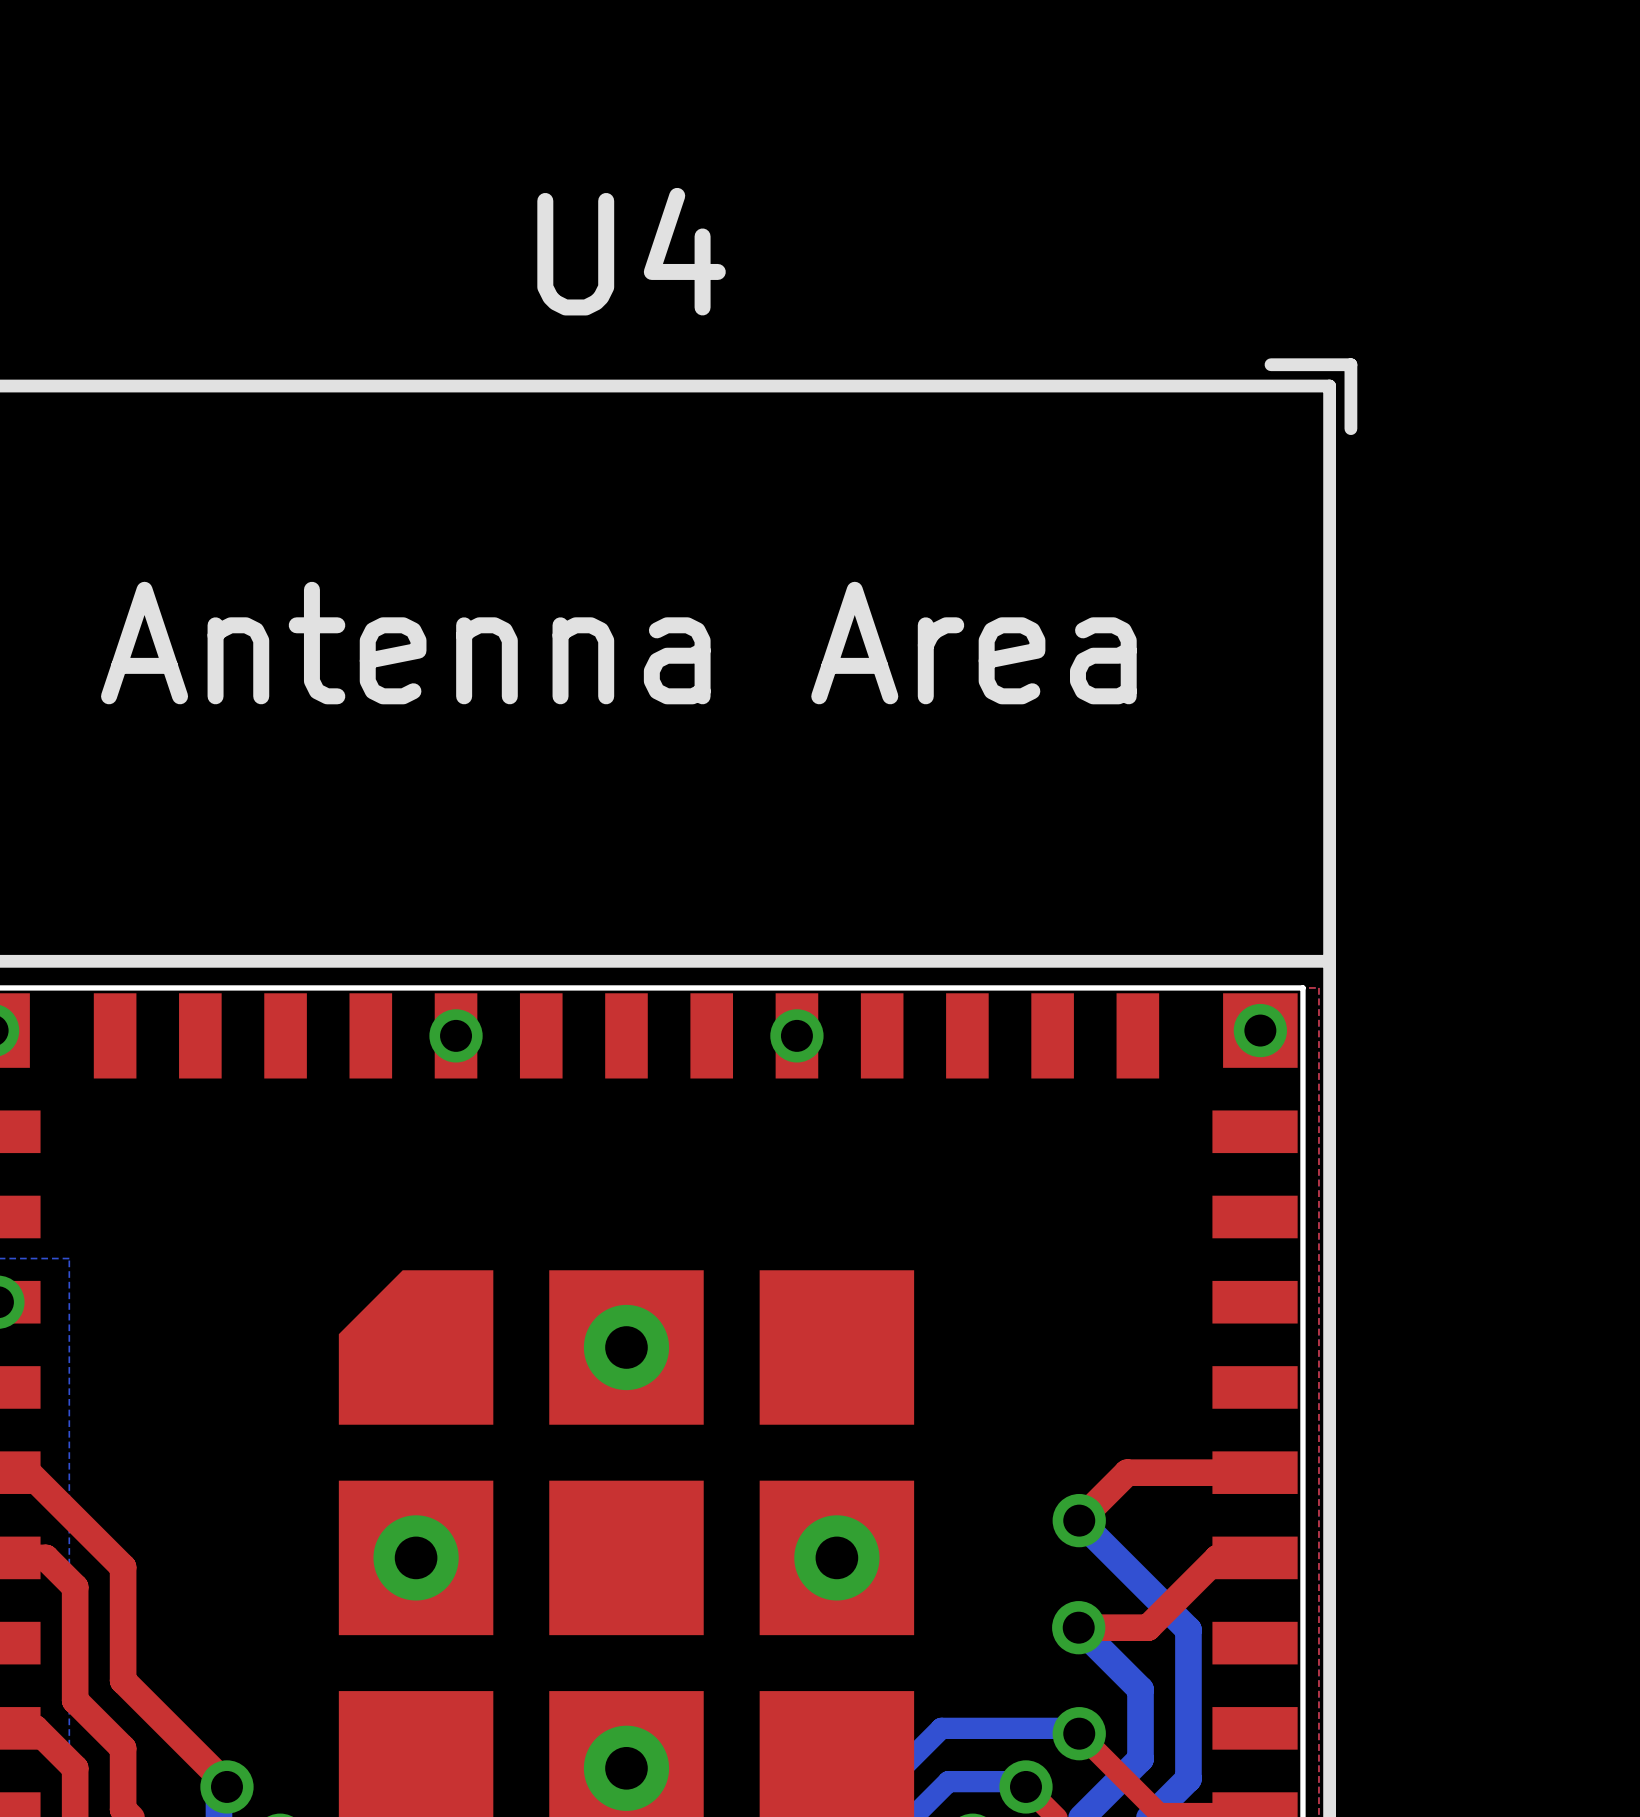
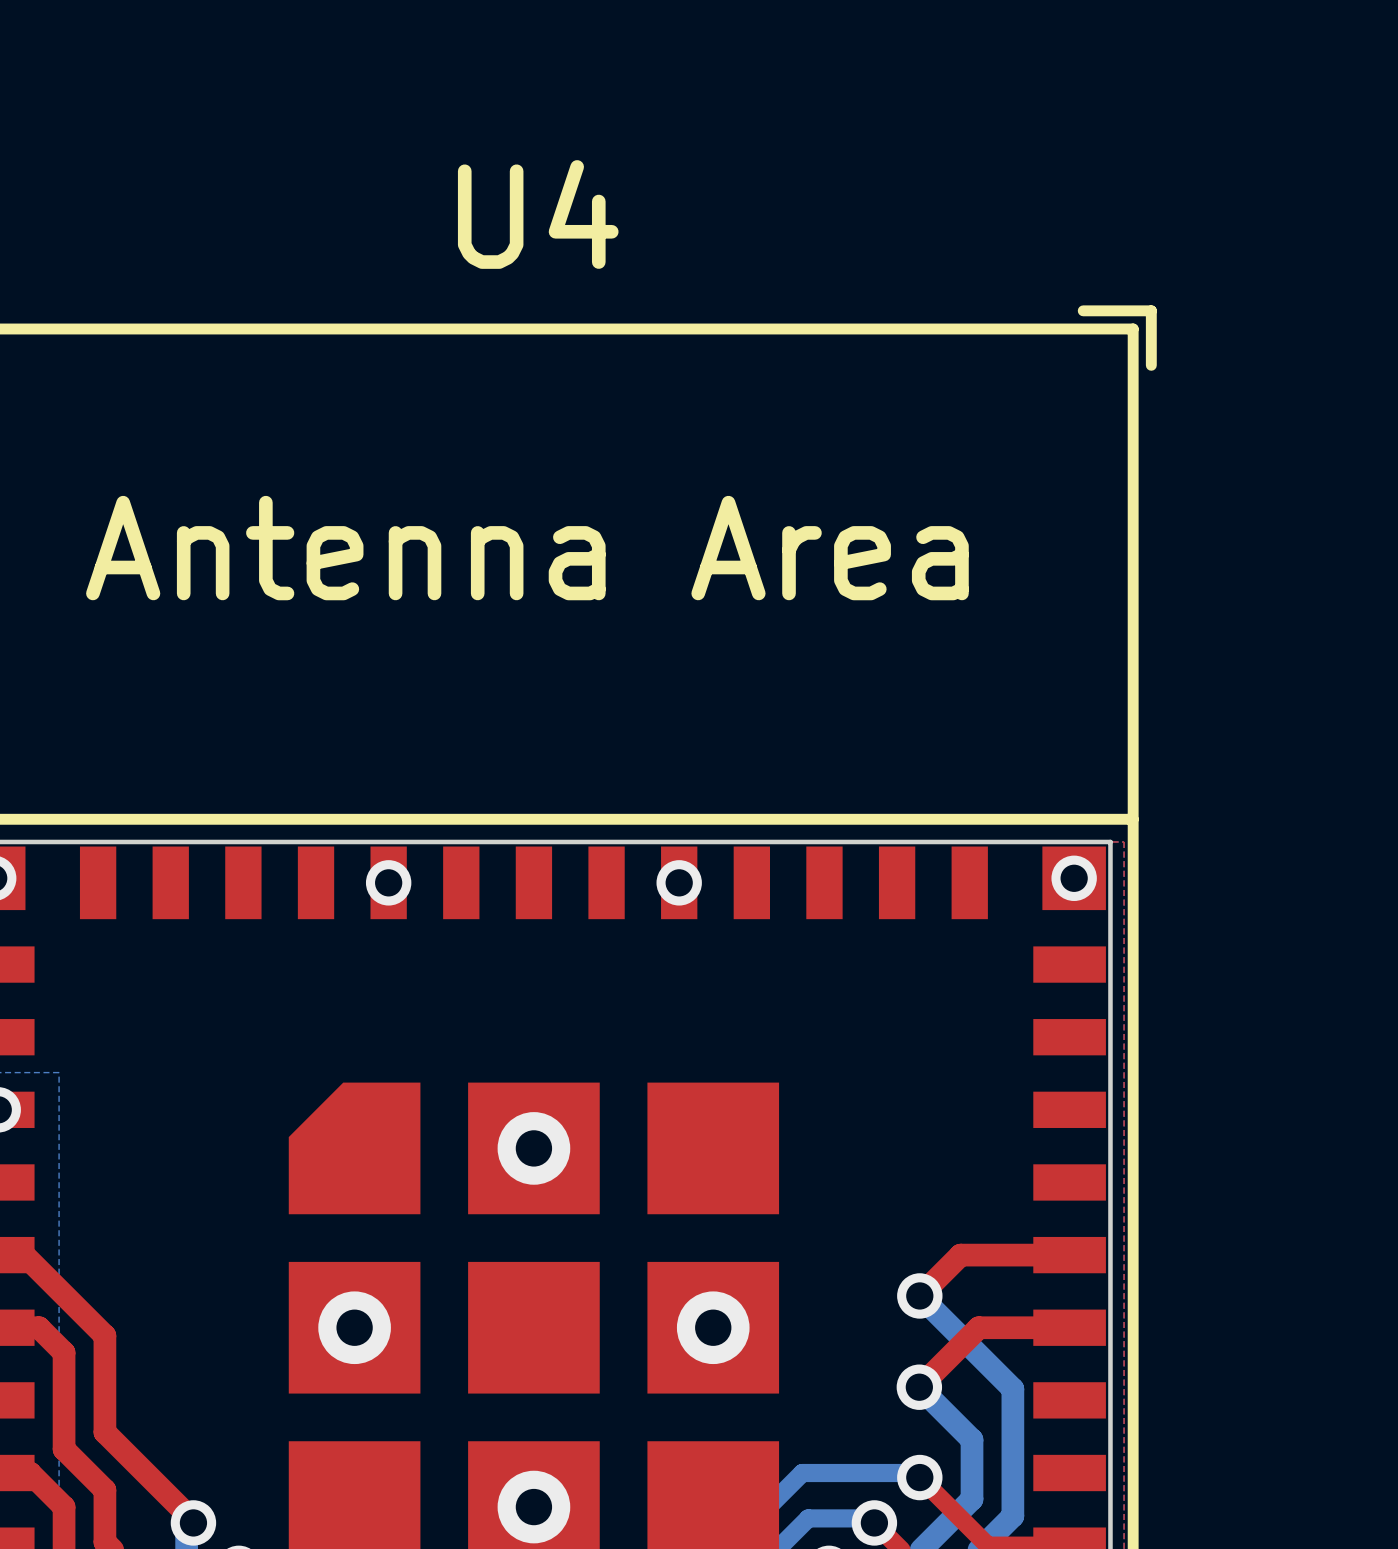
top track: (1217, 1557) (1147, 1627) (1078, 1627) -> (1037, 1327) (978, 1327) (919, 1387)

